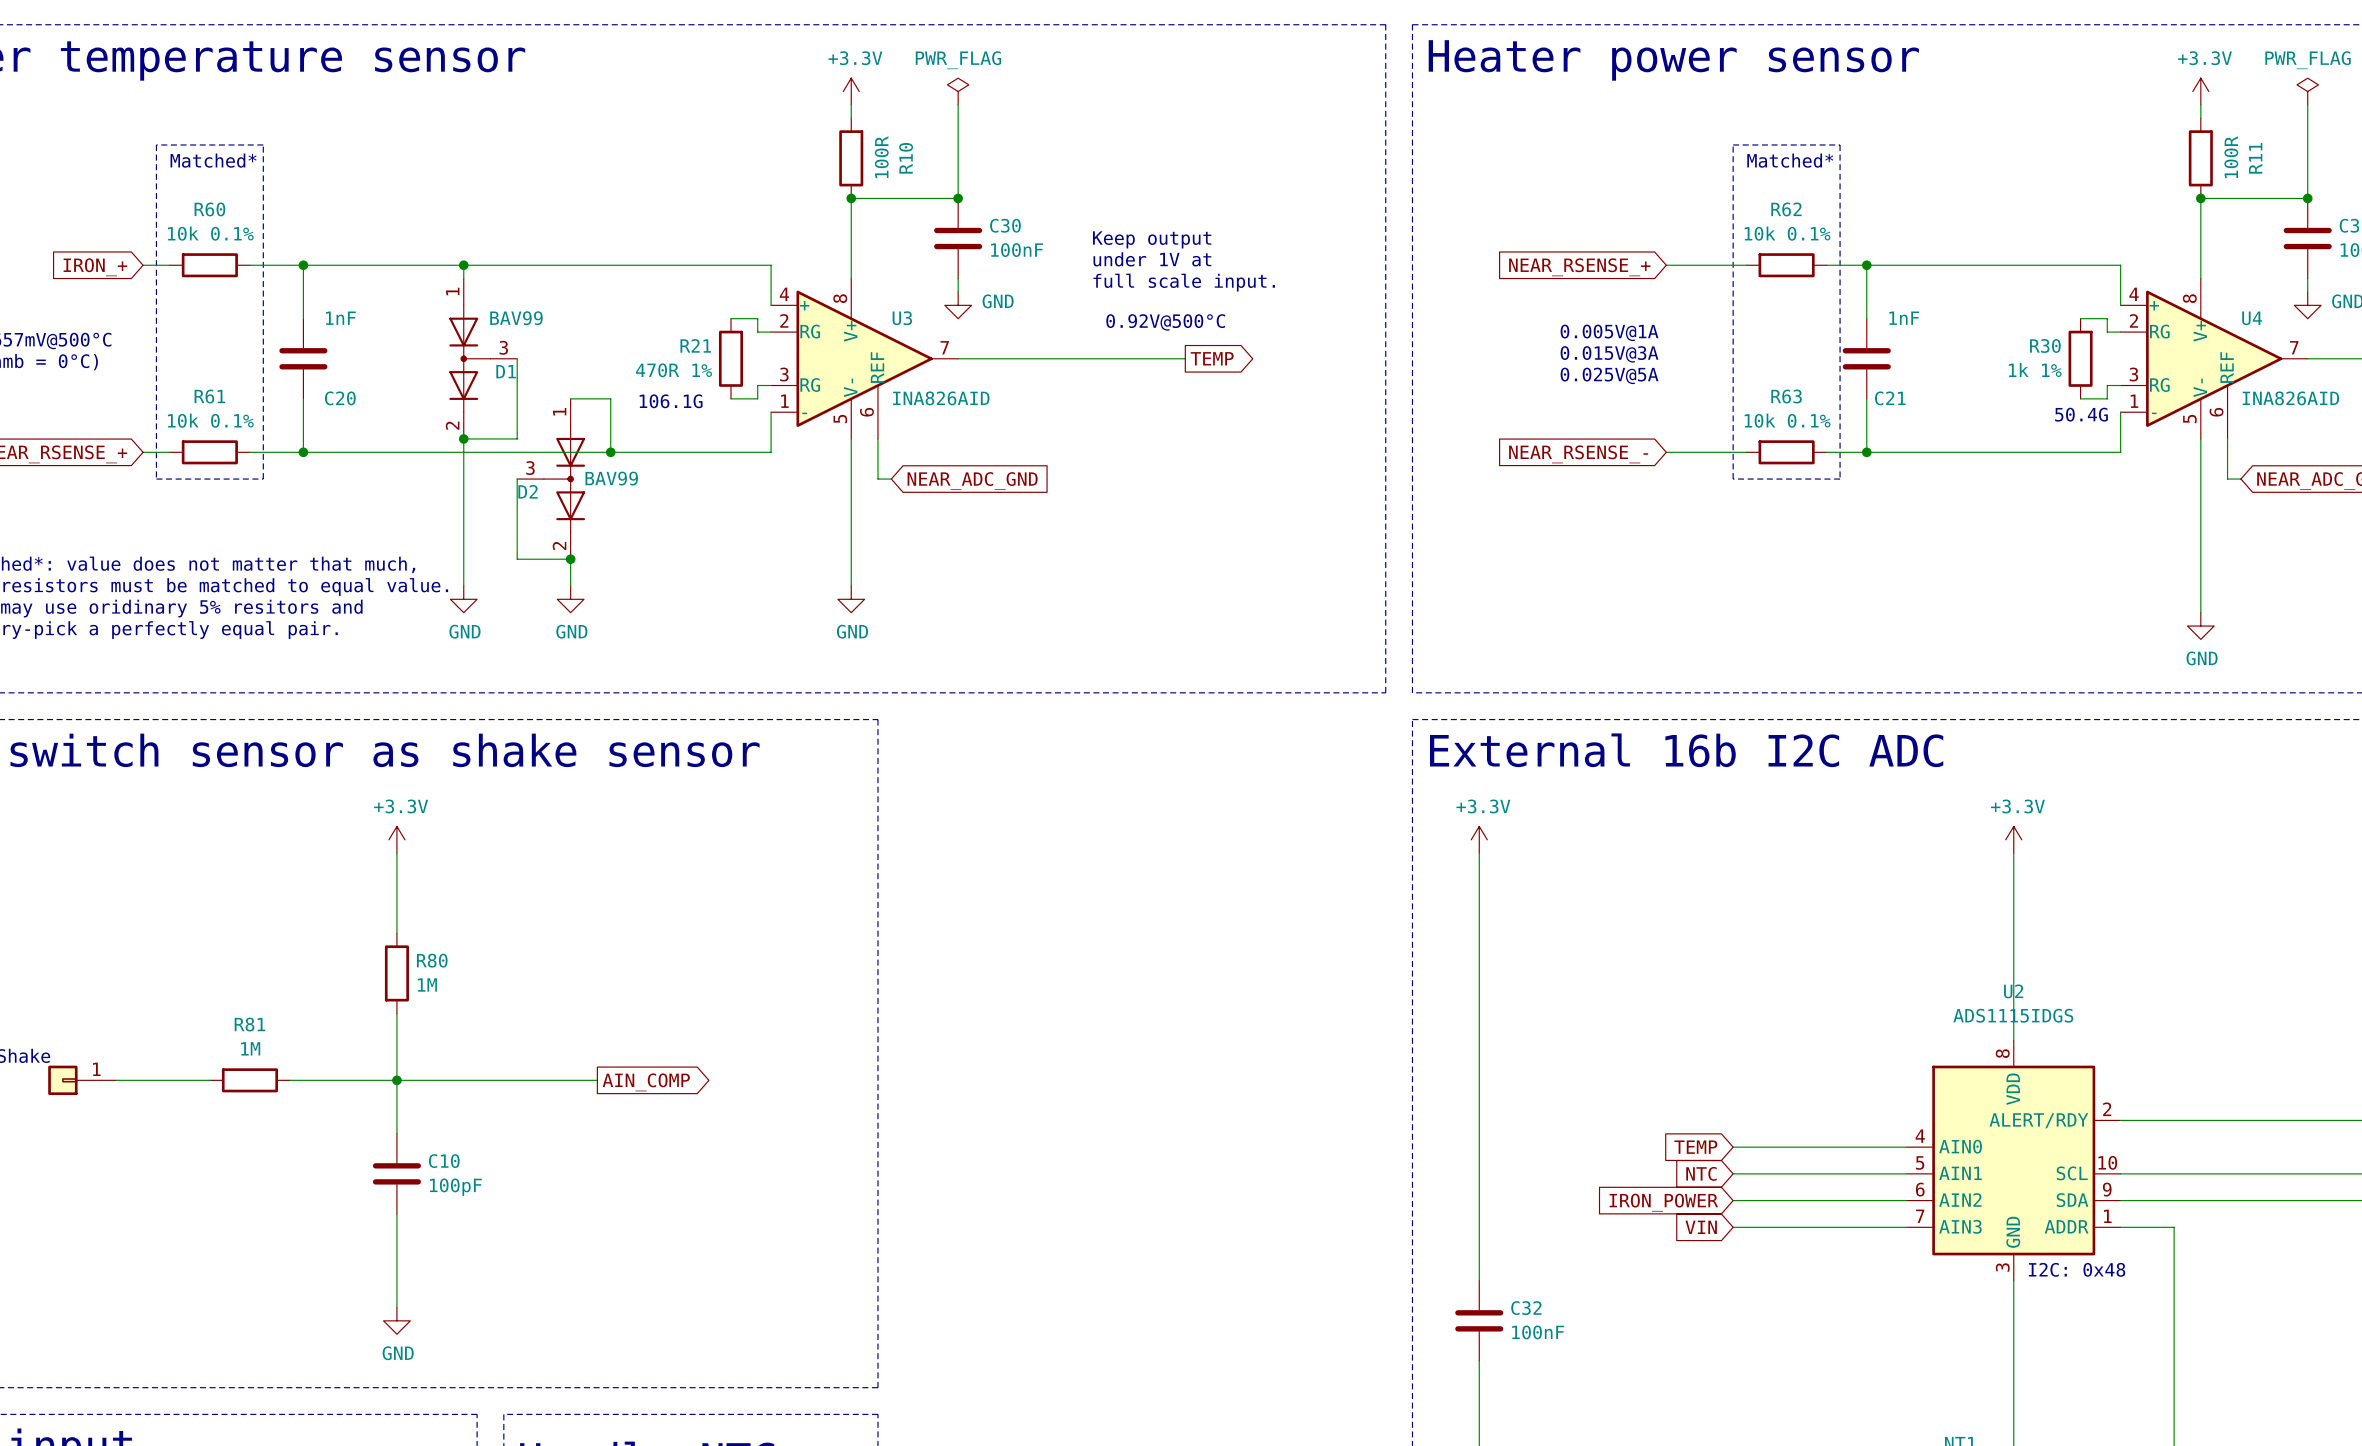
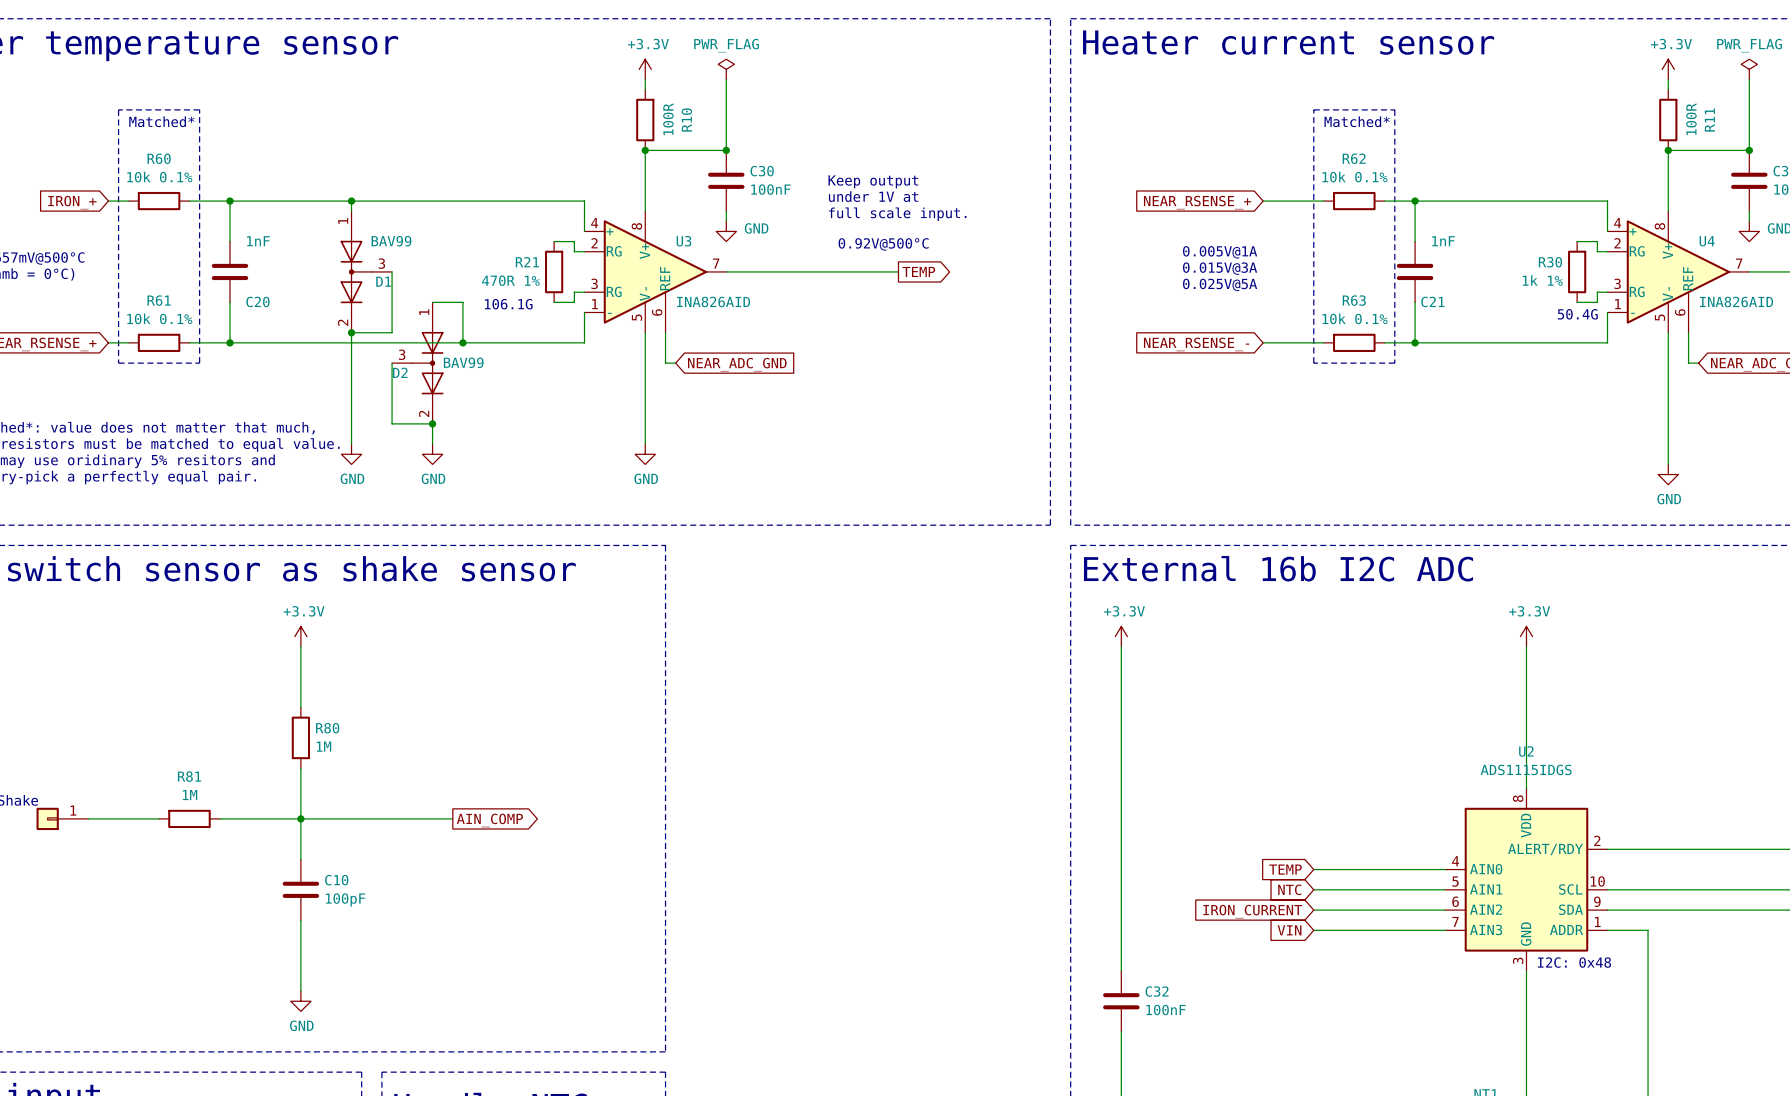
text: Heater power sensor (1673, 60) -> Heater current sensor (1288, 42)
global label: IRON_POWER (1663, 1202) -> IRON_CURRENT (1252, 911)

